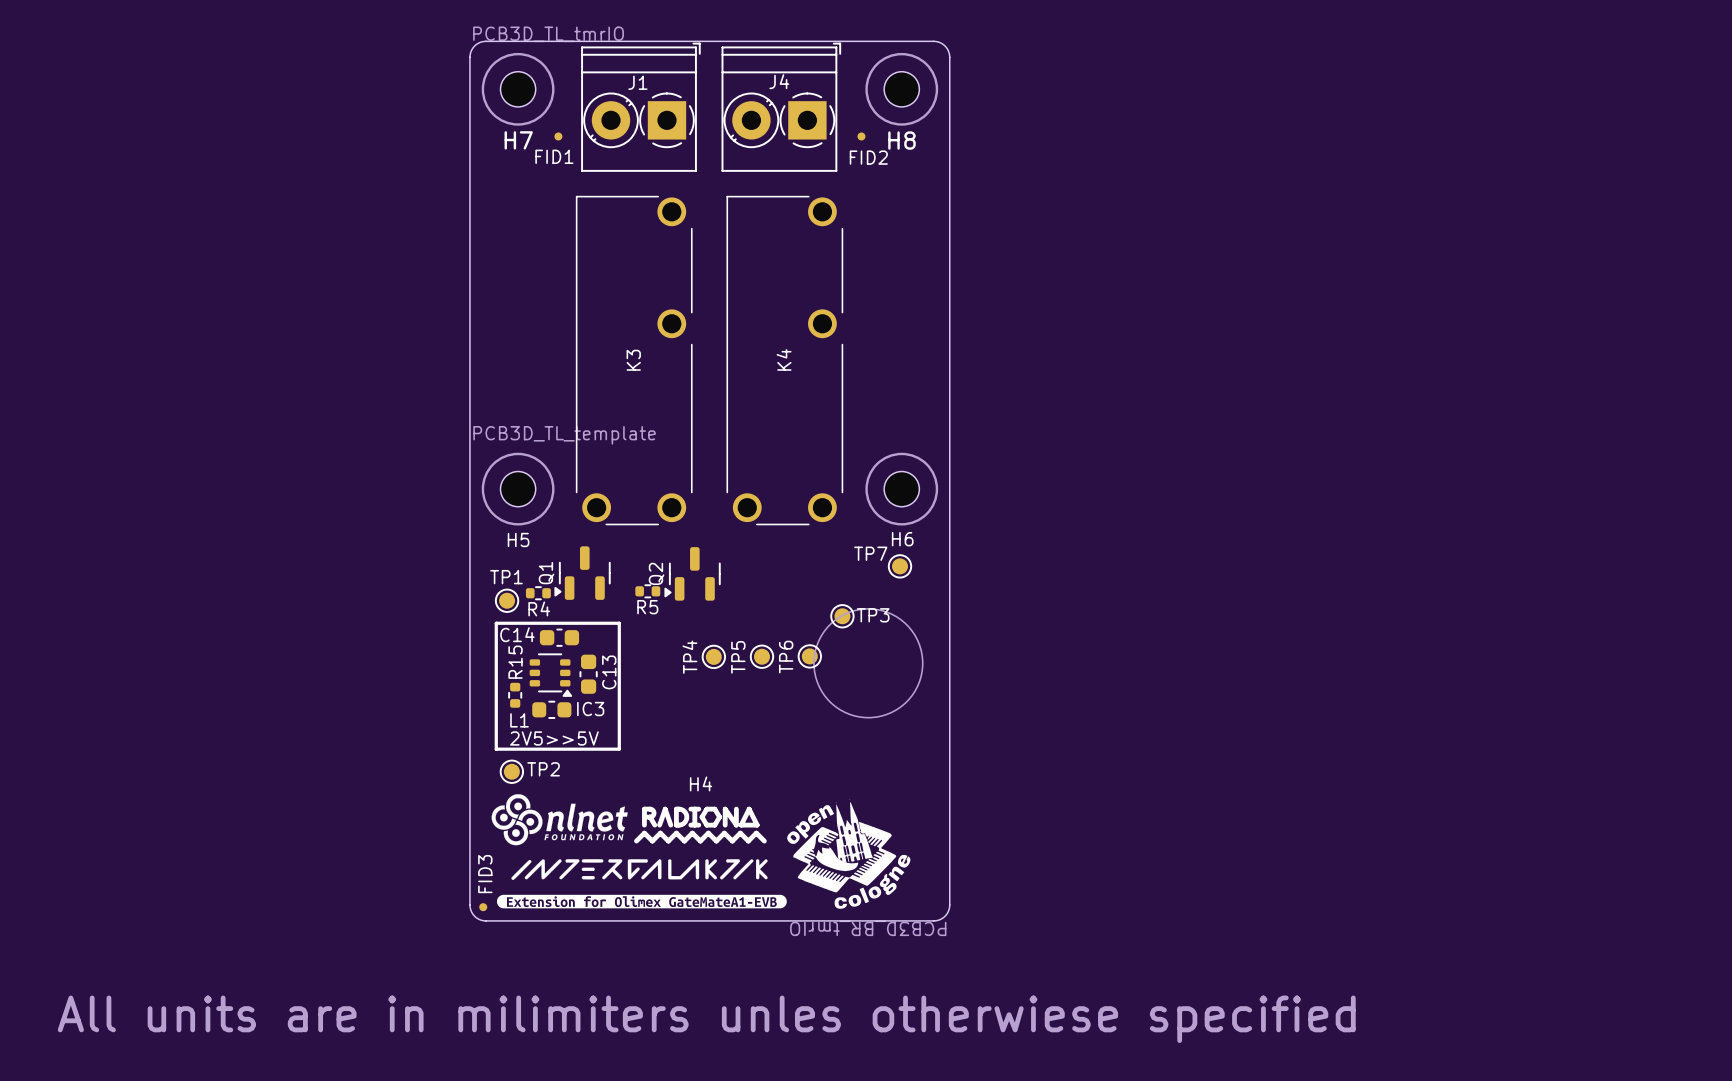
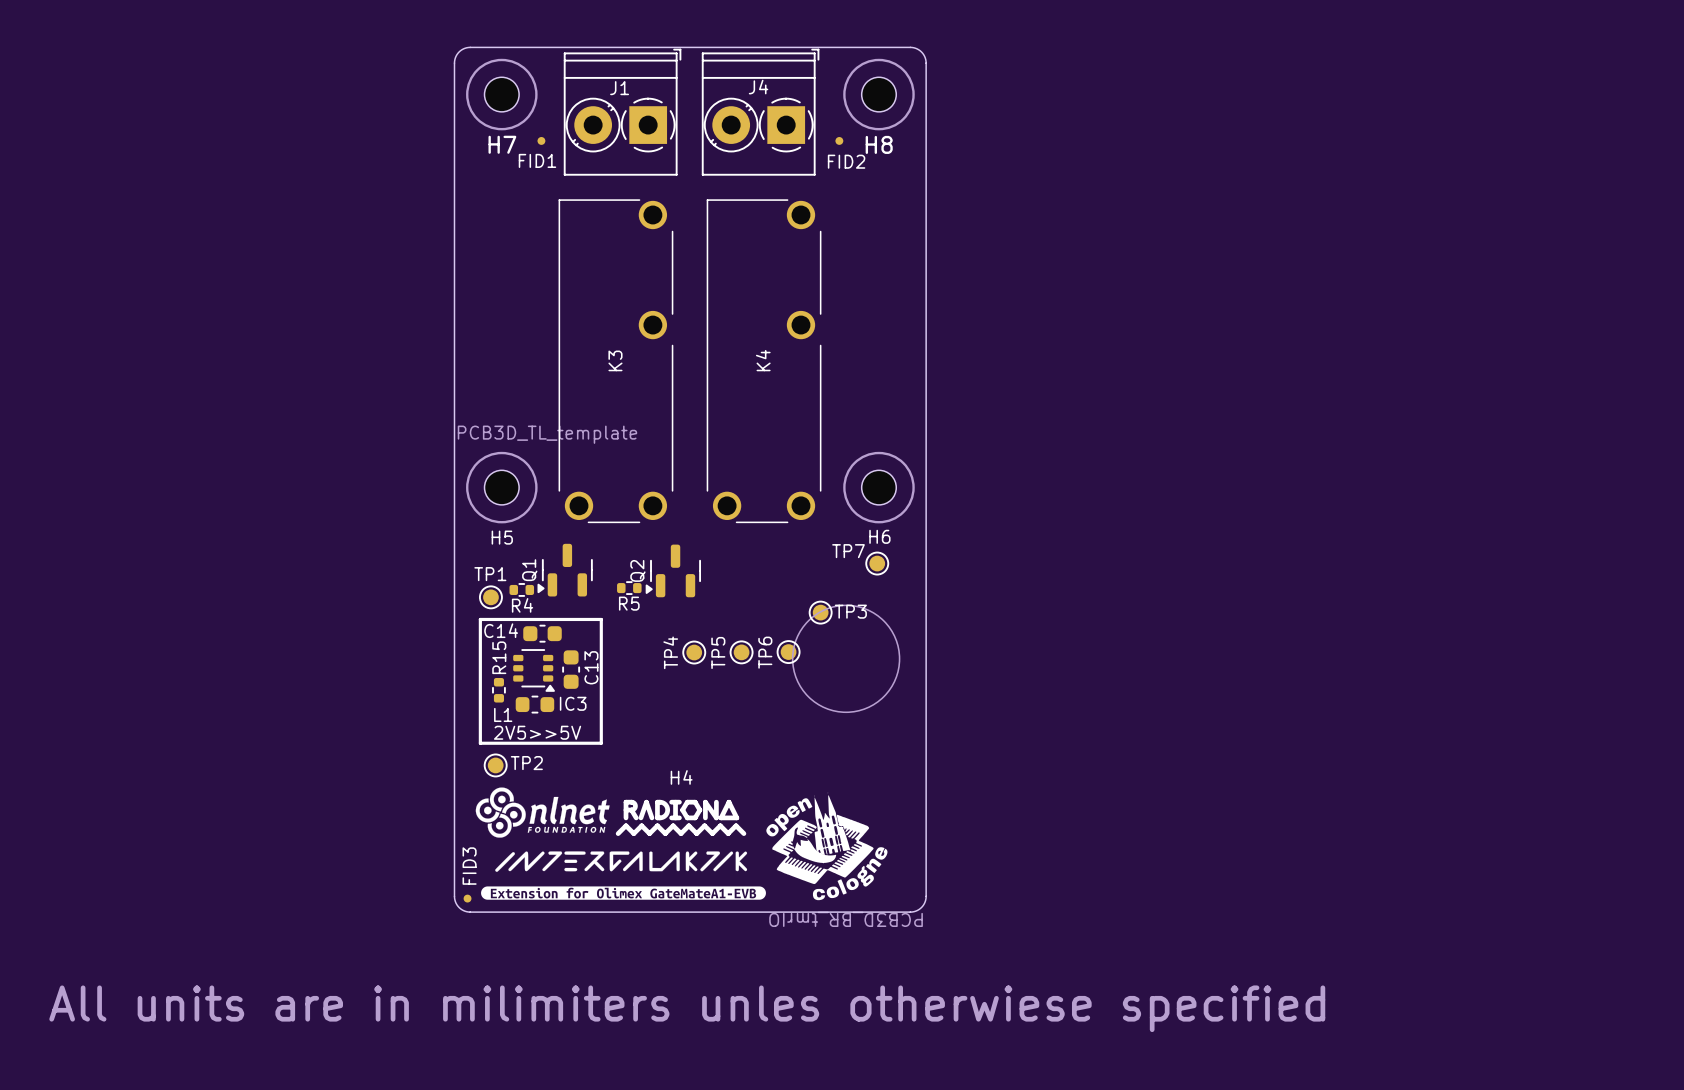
text: PCB3D_TL_tmrIO (548, 34) -> none

